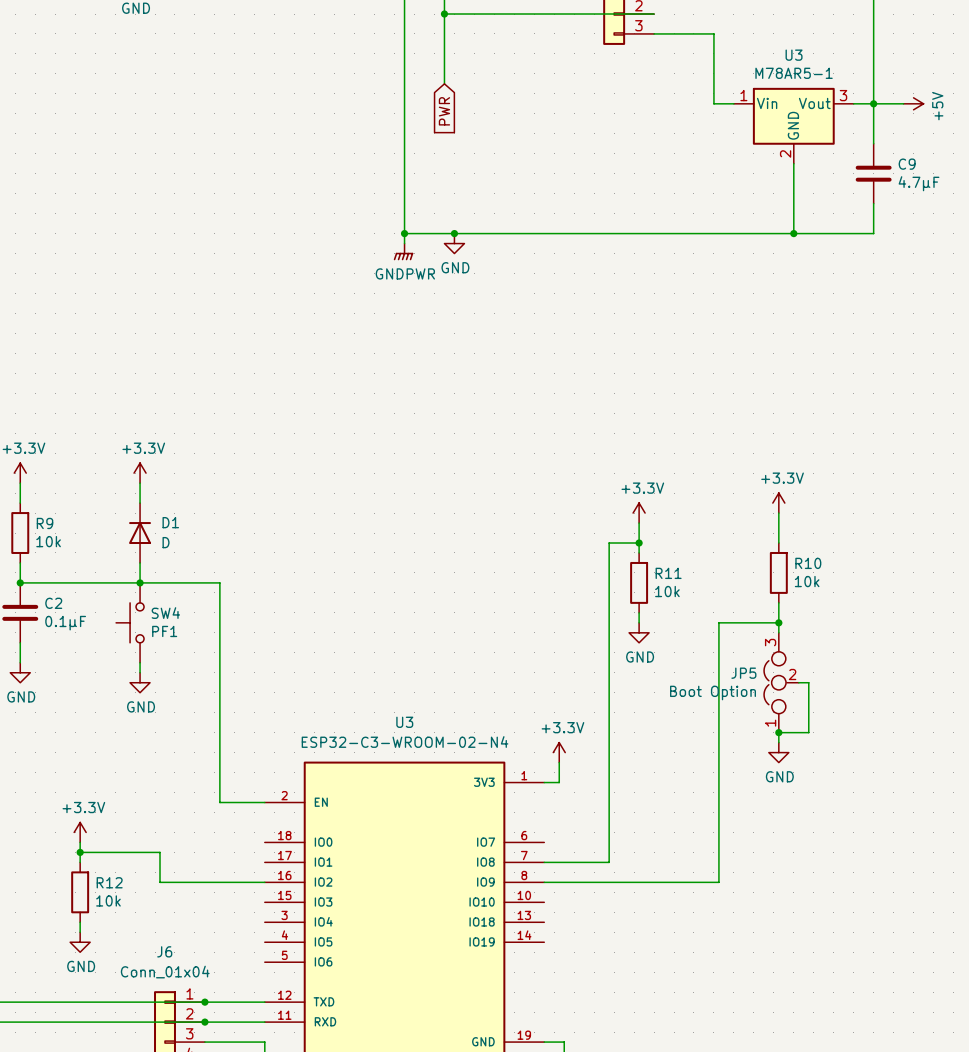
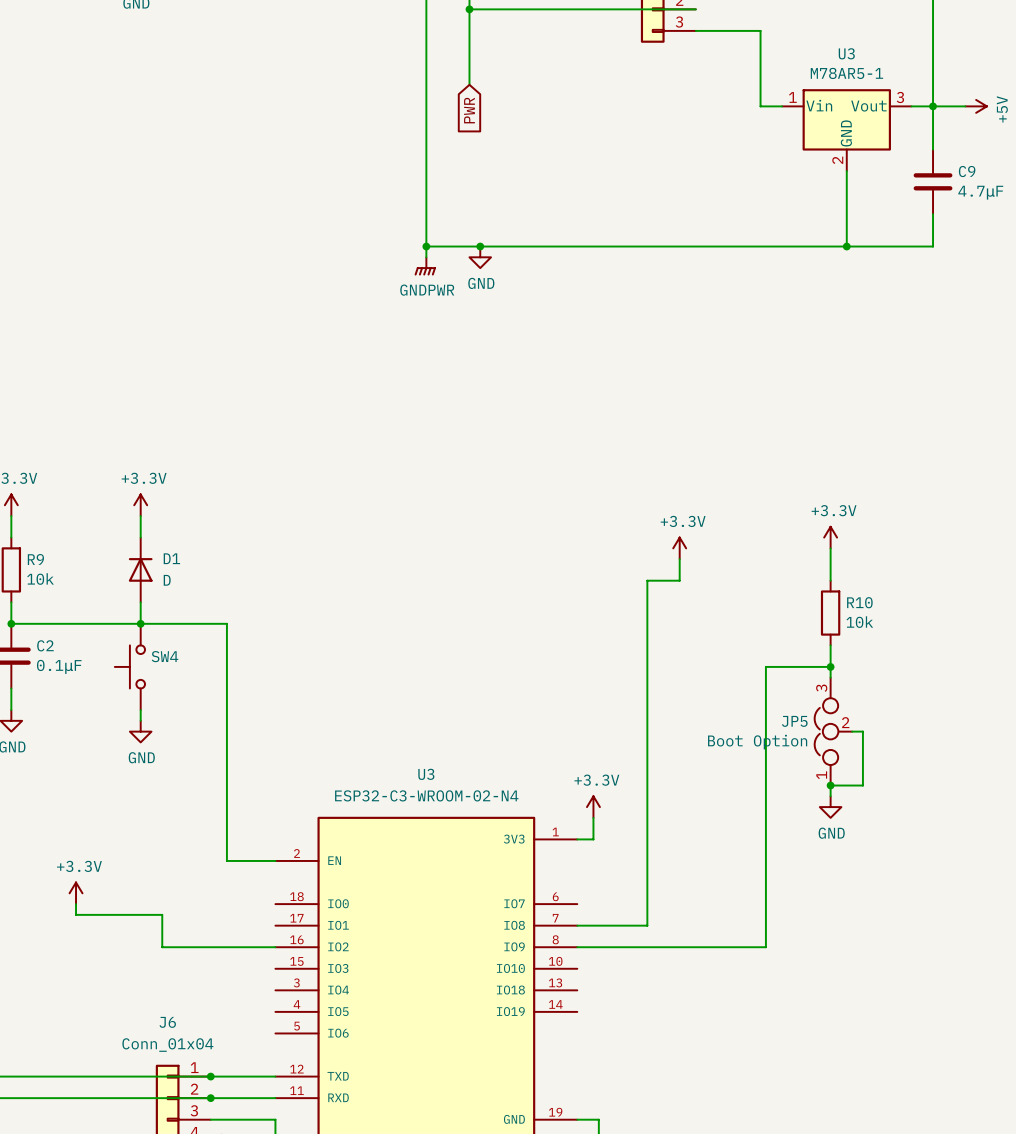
wire: (639, 543) (639, 552) -> none
junction: (639, 543) -> none
R11: 10k (639, 582) -> none
wire: (639, 612) (639, 622) -> none
SW4 value: PF1 (164, 631) -> none
power symbol: GND (639, 632) -> none
wire: (80, 852) (80, 862) -> none
junction: (80, 852) -> none
R12: 10k (80, 892) -> none
wire: (80, 922) (80, 932) -> none
power symbol: GND (80, 942) -> none

